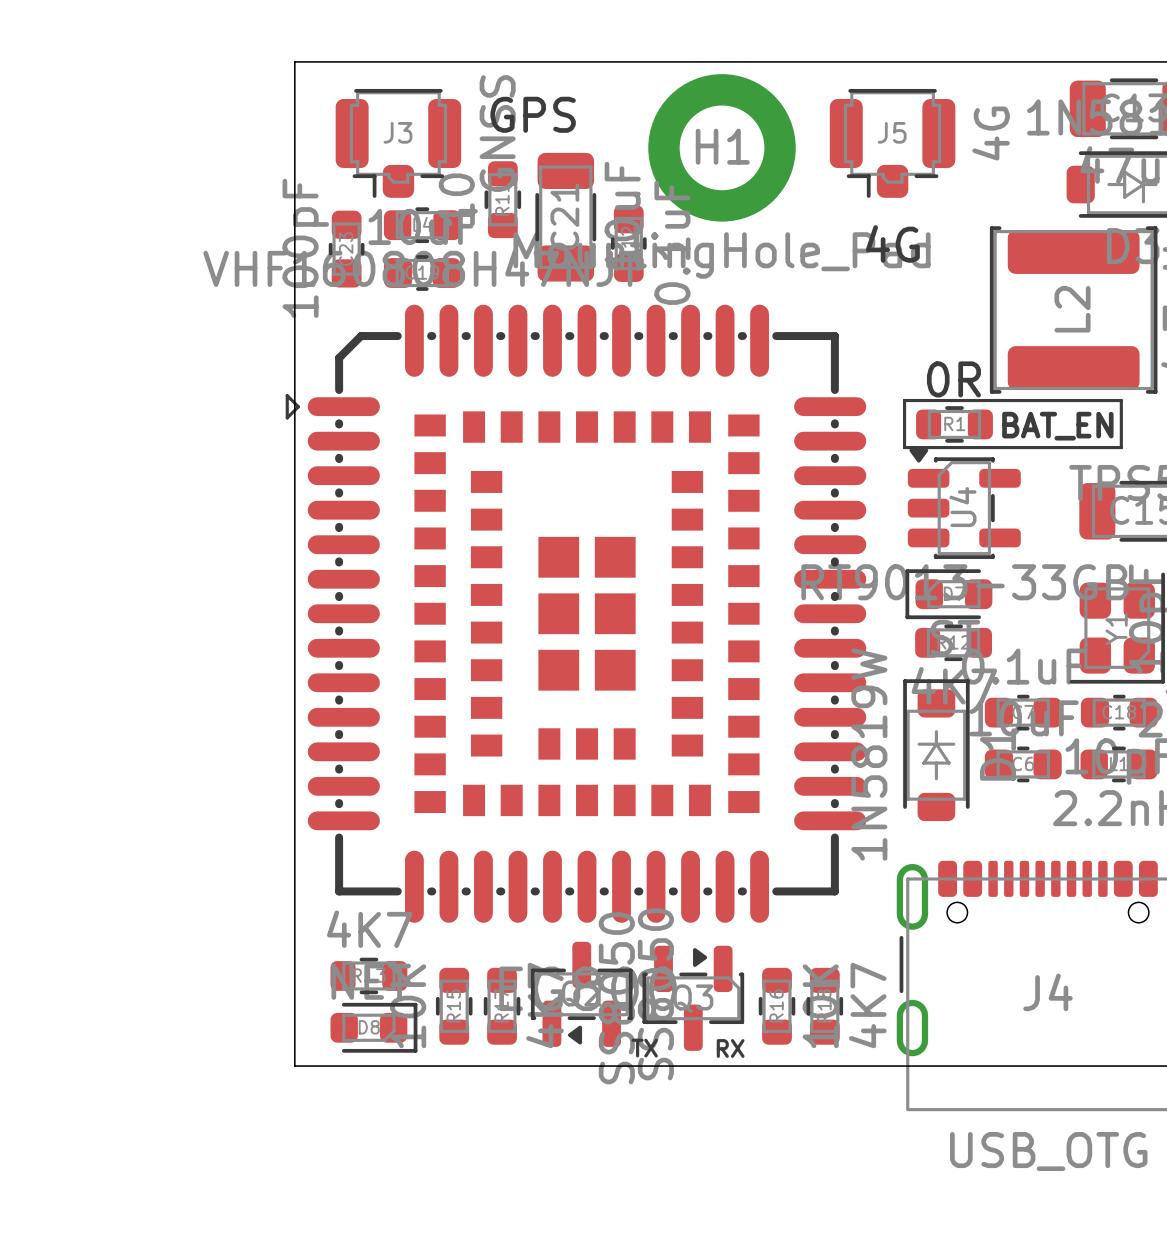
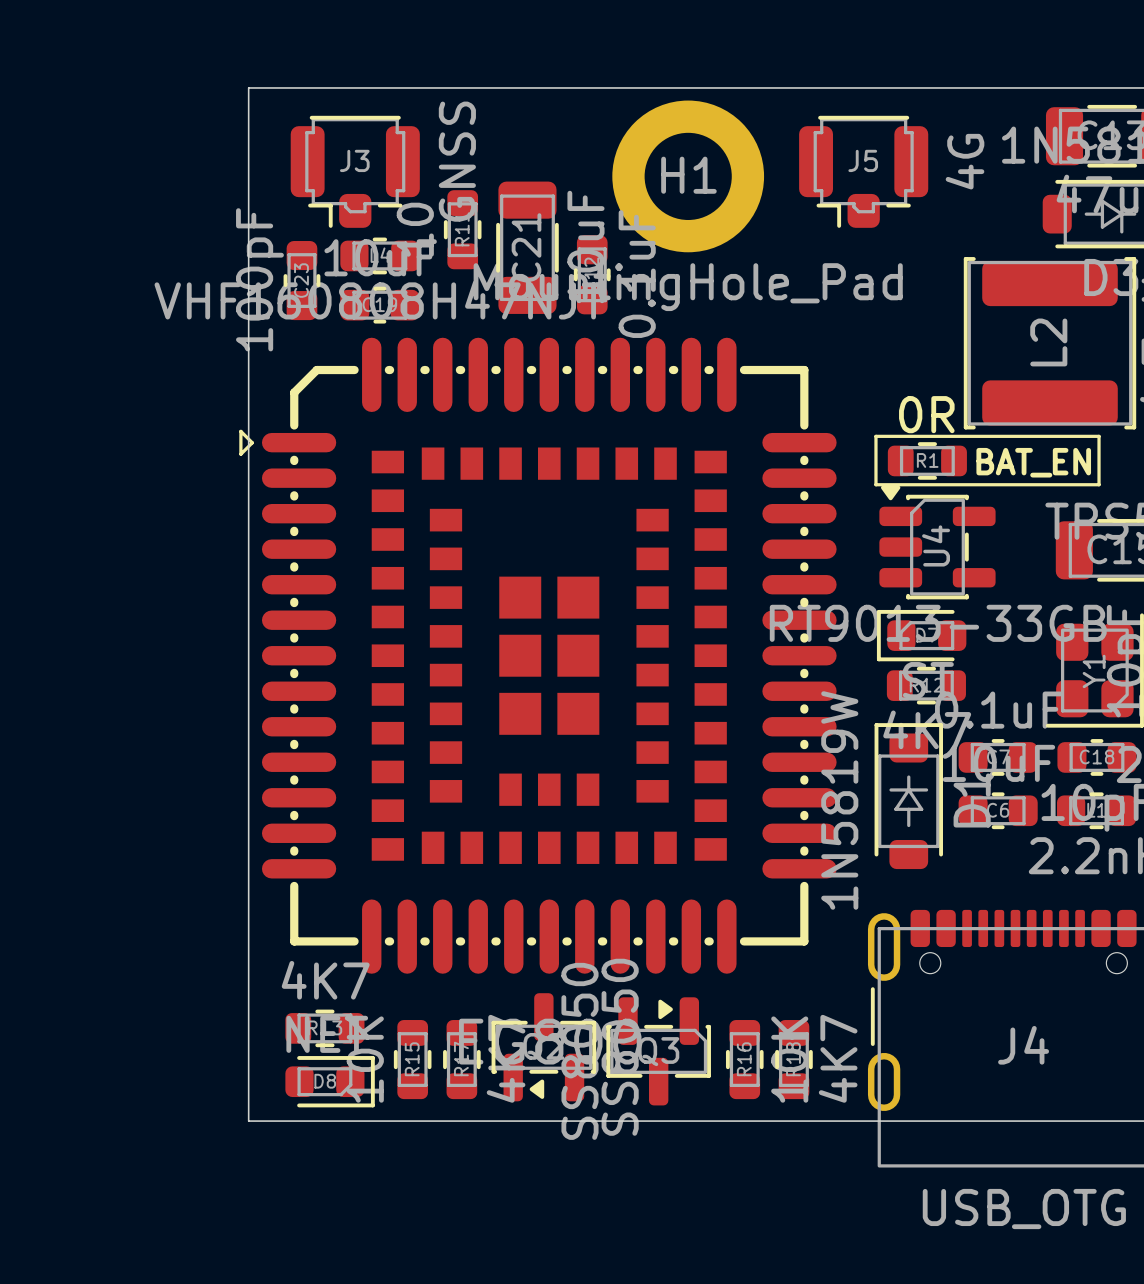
text: GPS (533, 114) -> none
text: 4G (892, 243) -> none
text: TX (644, 1048) -> none
text: RX (730, 1048) -> none

